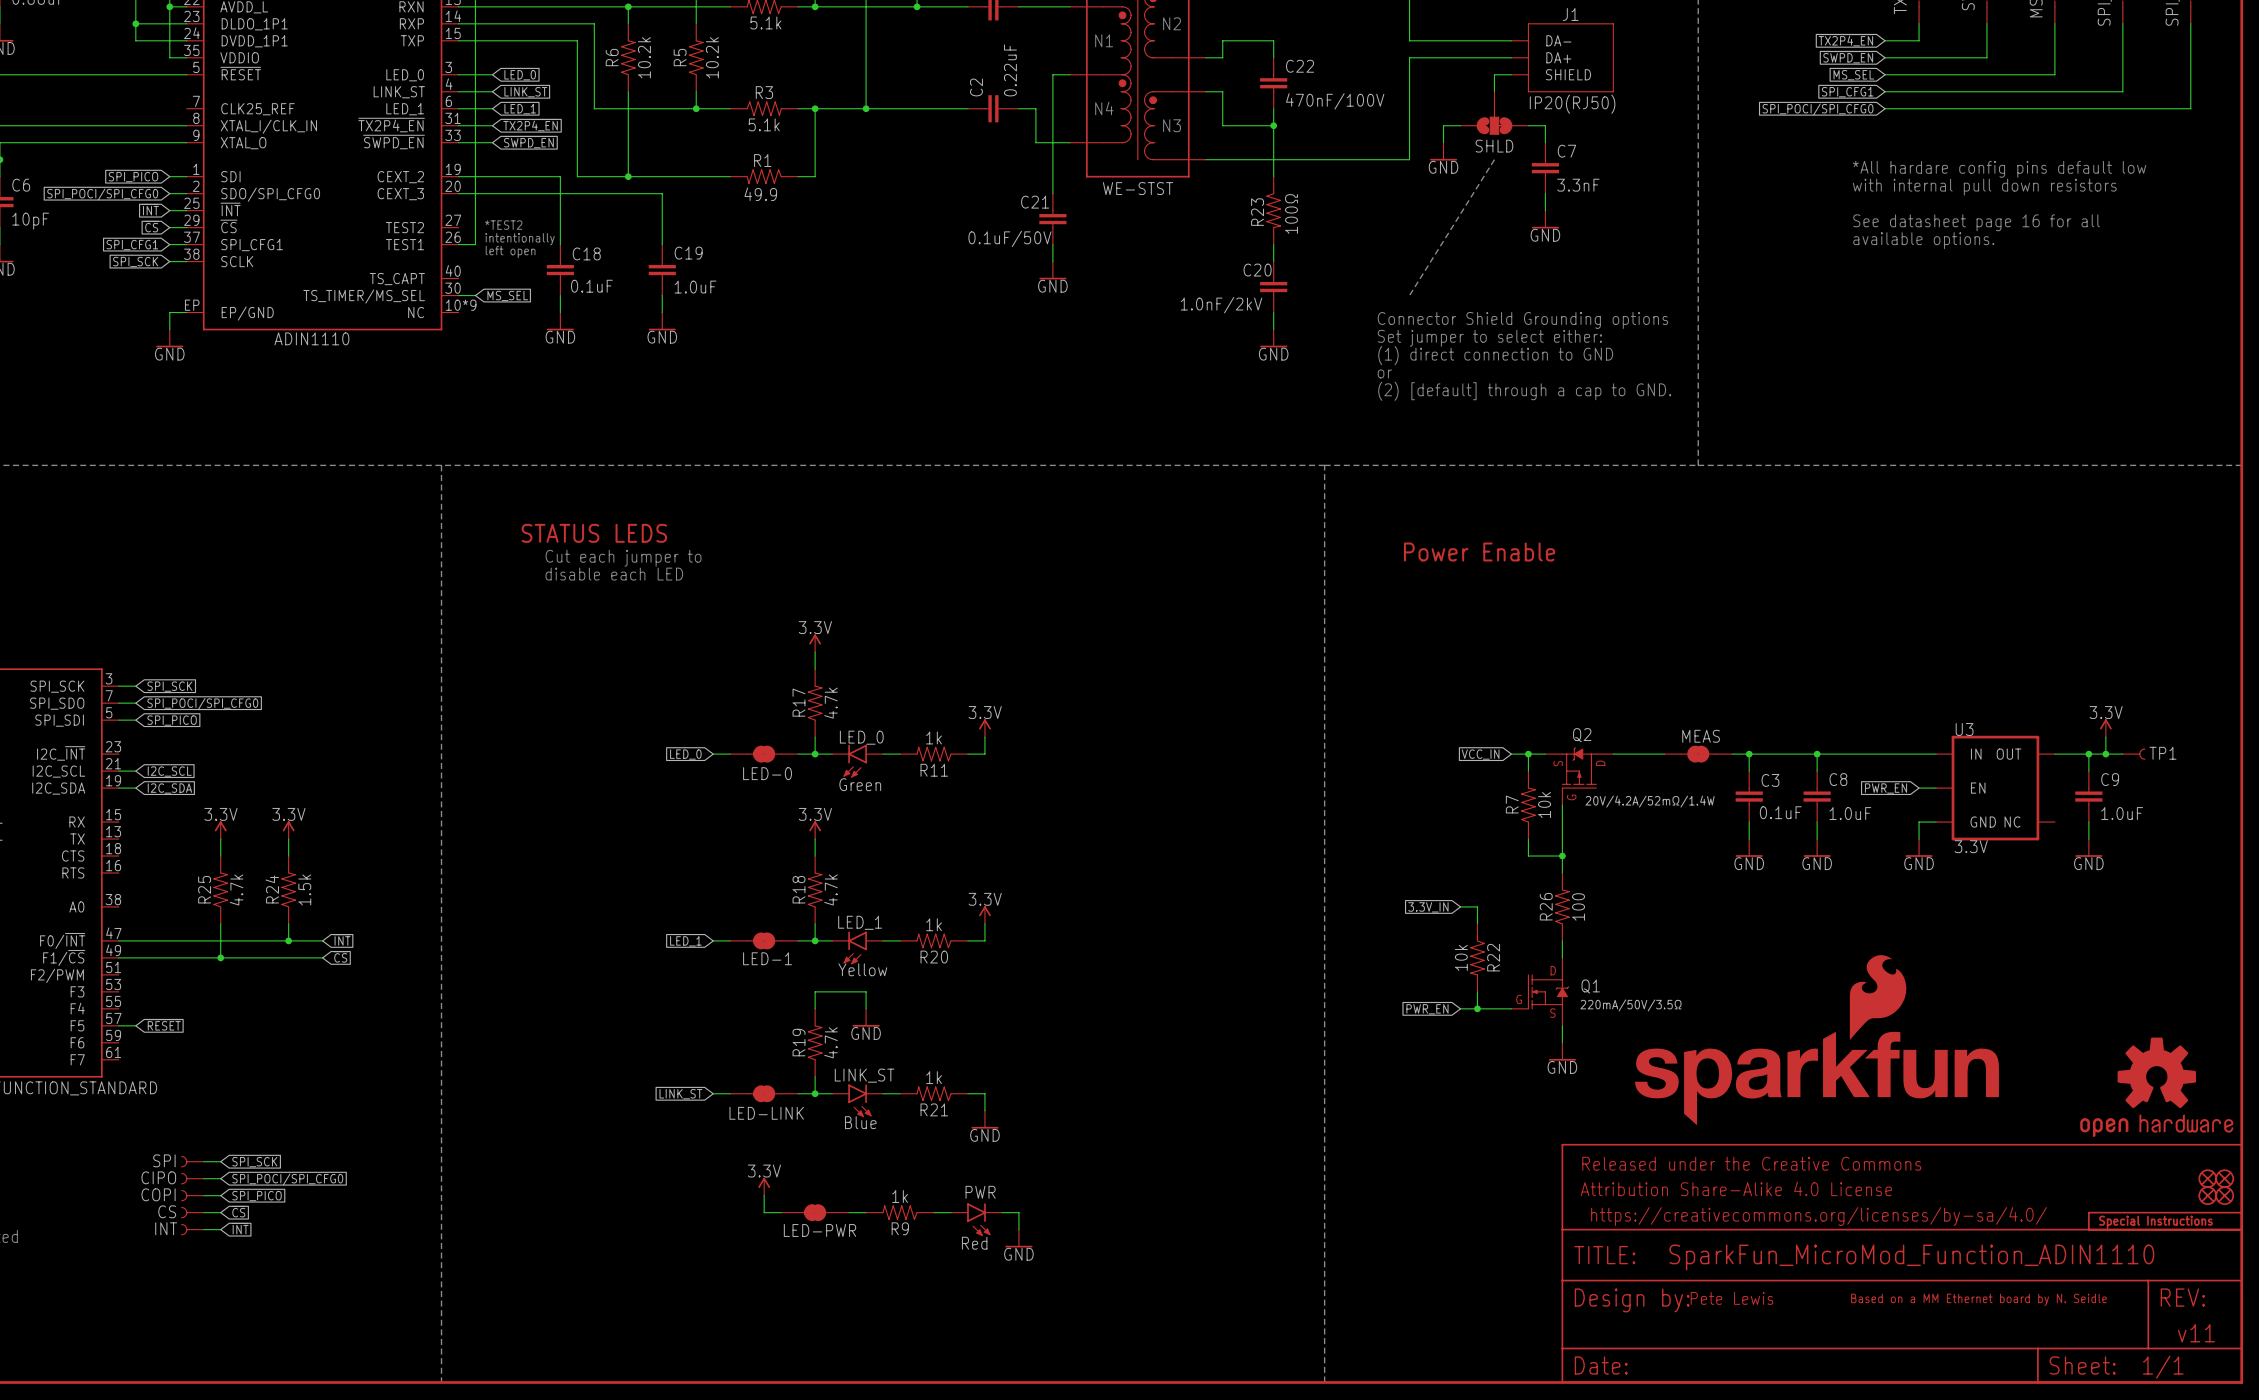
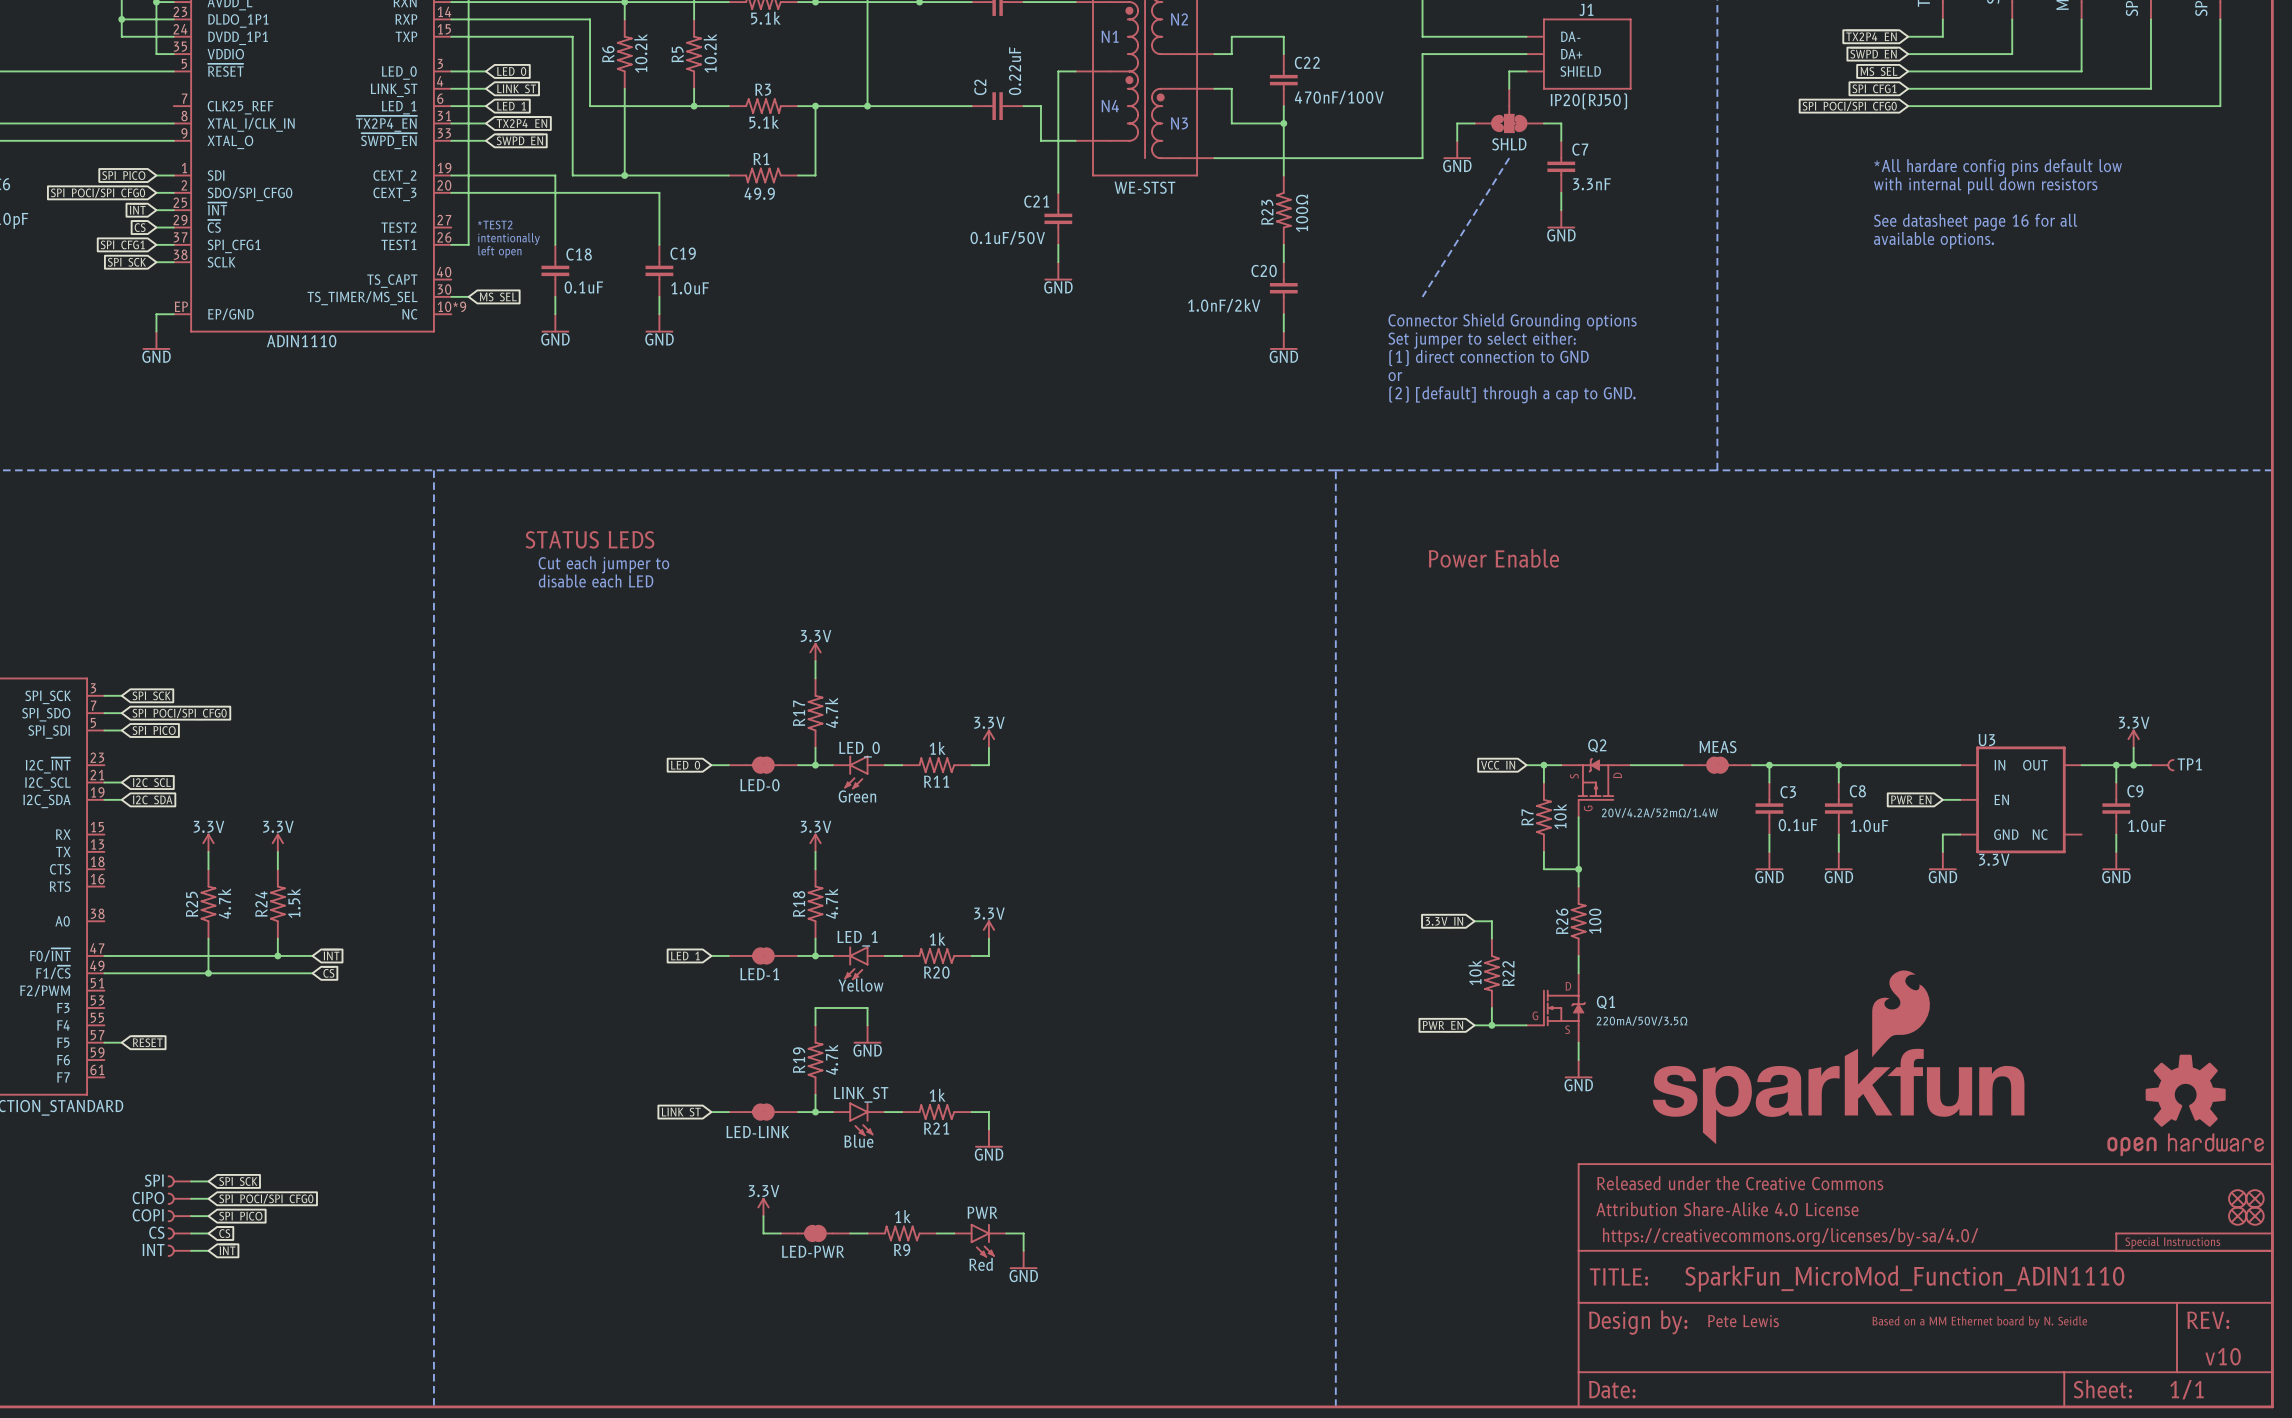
text: v11 (2196, 1333) -> v10 (2223, 1356)

